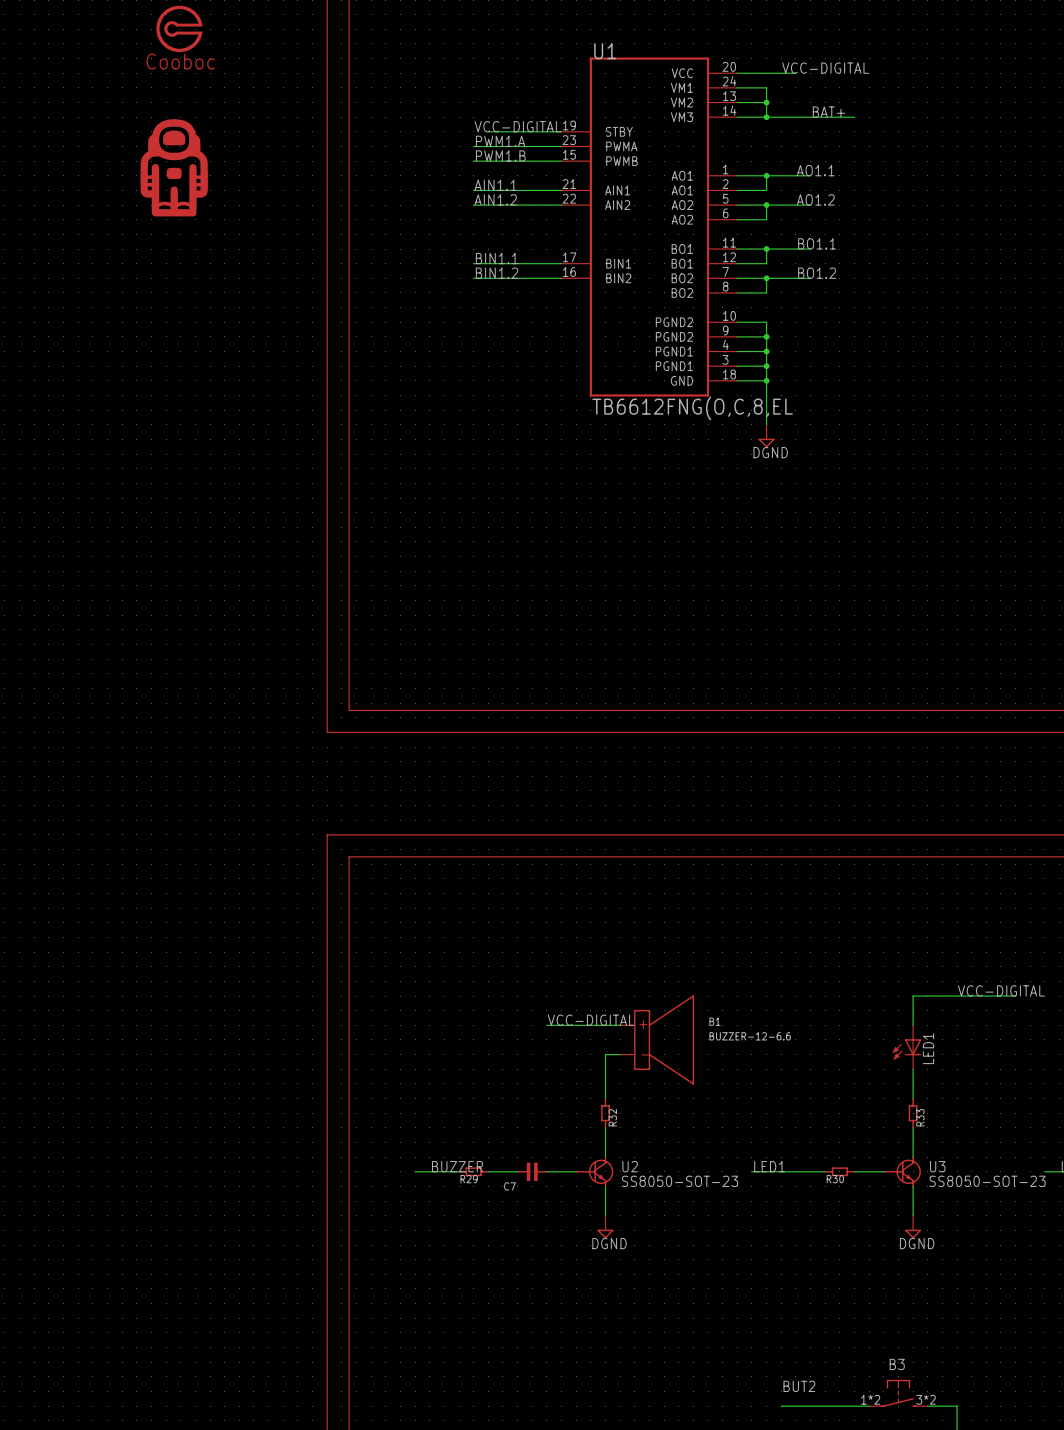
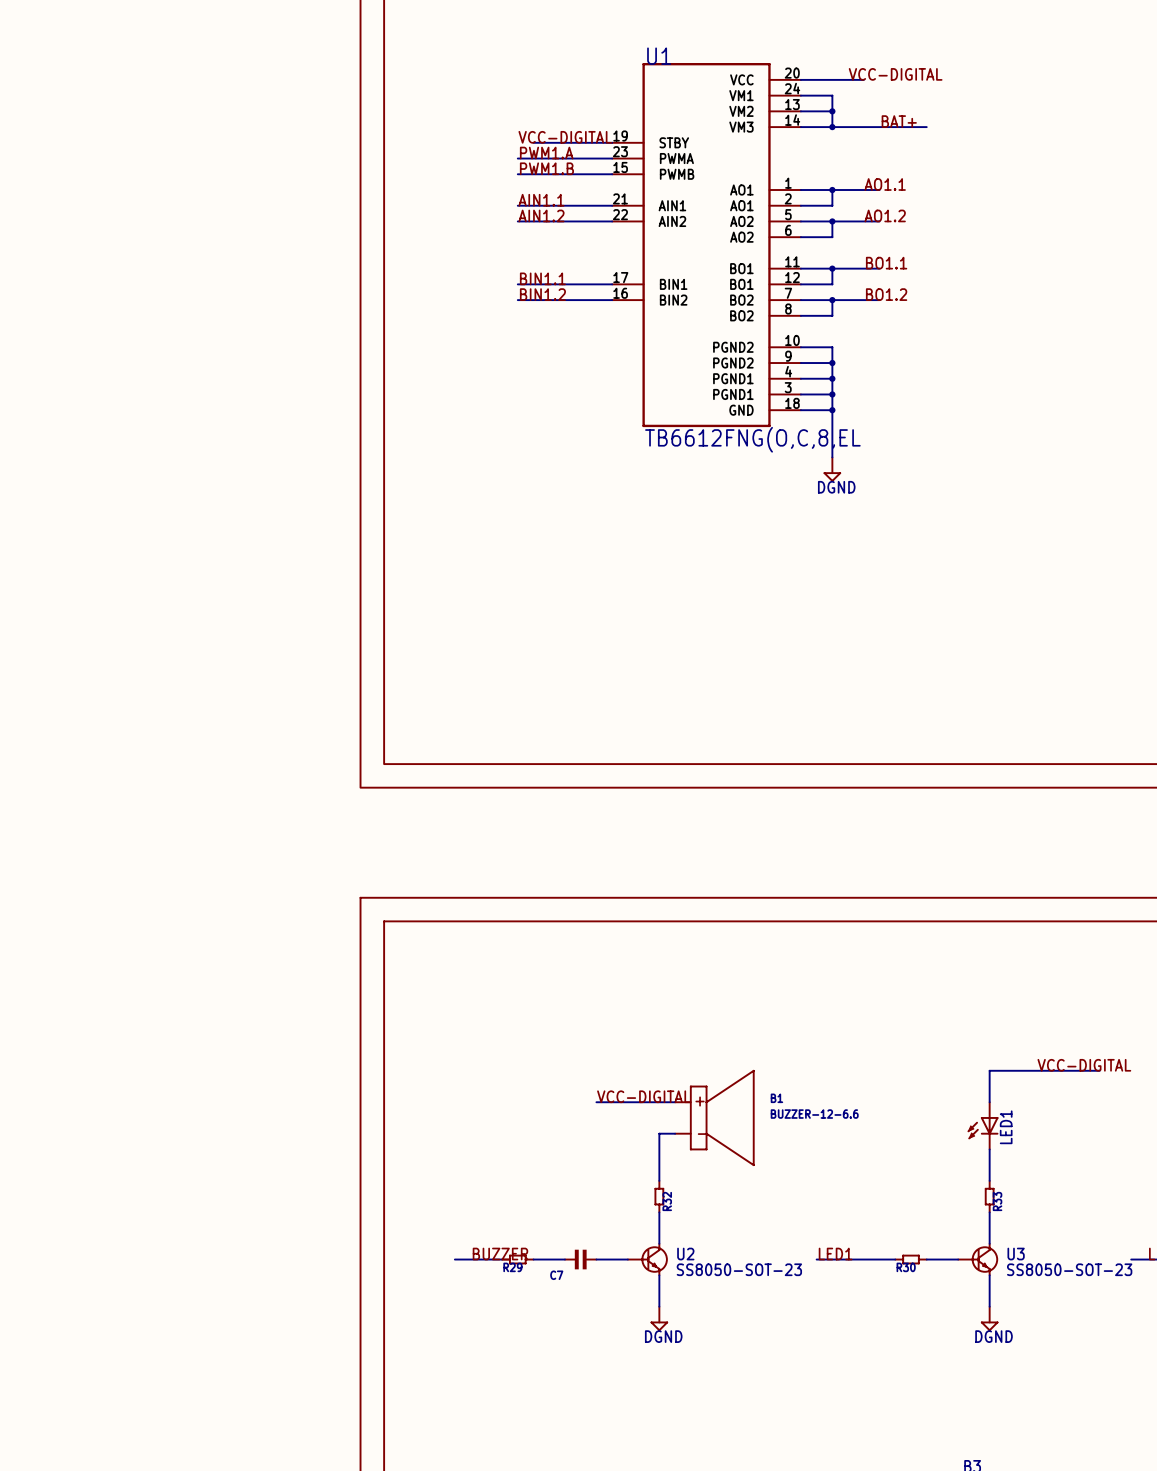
part: (179, 28) -> none
part: (174, 167) -> none

